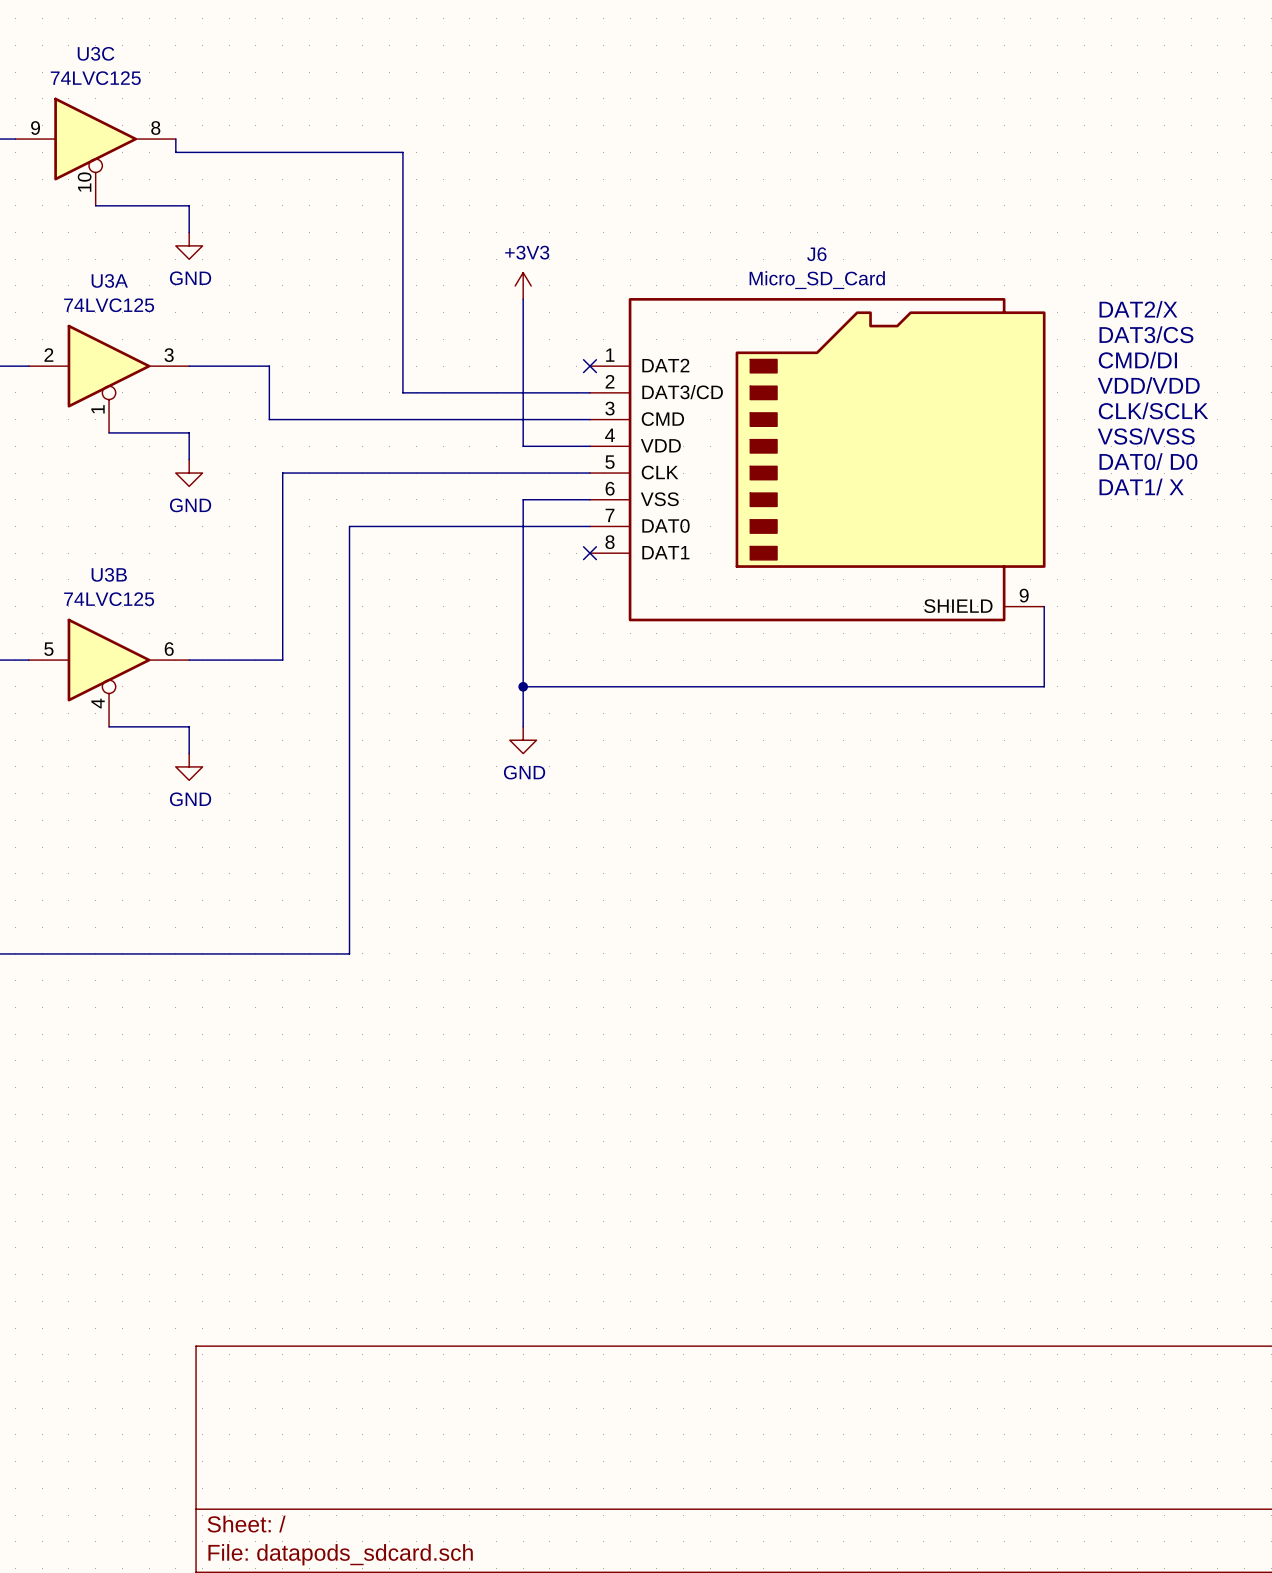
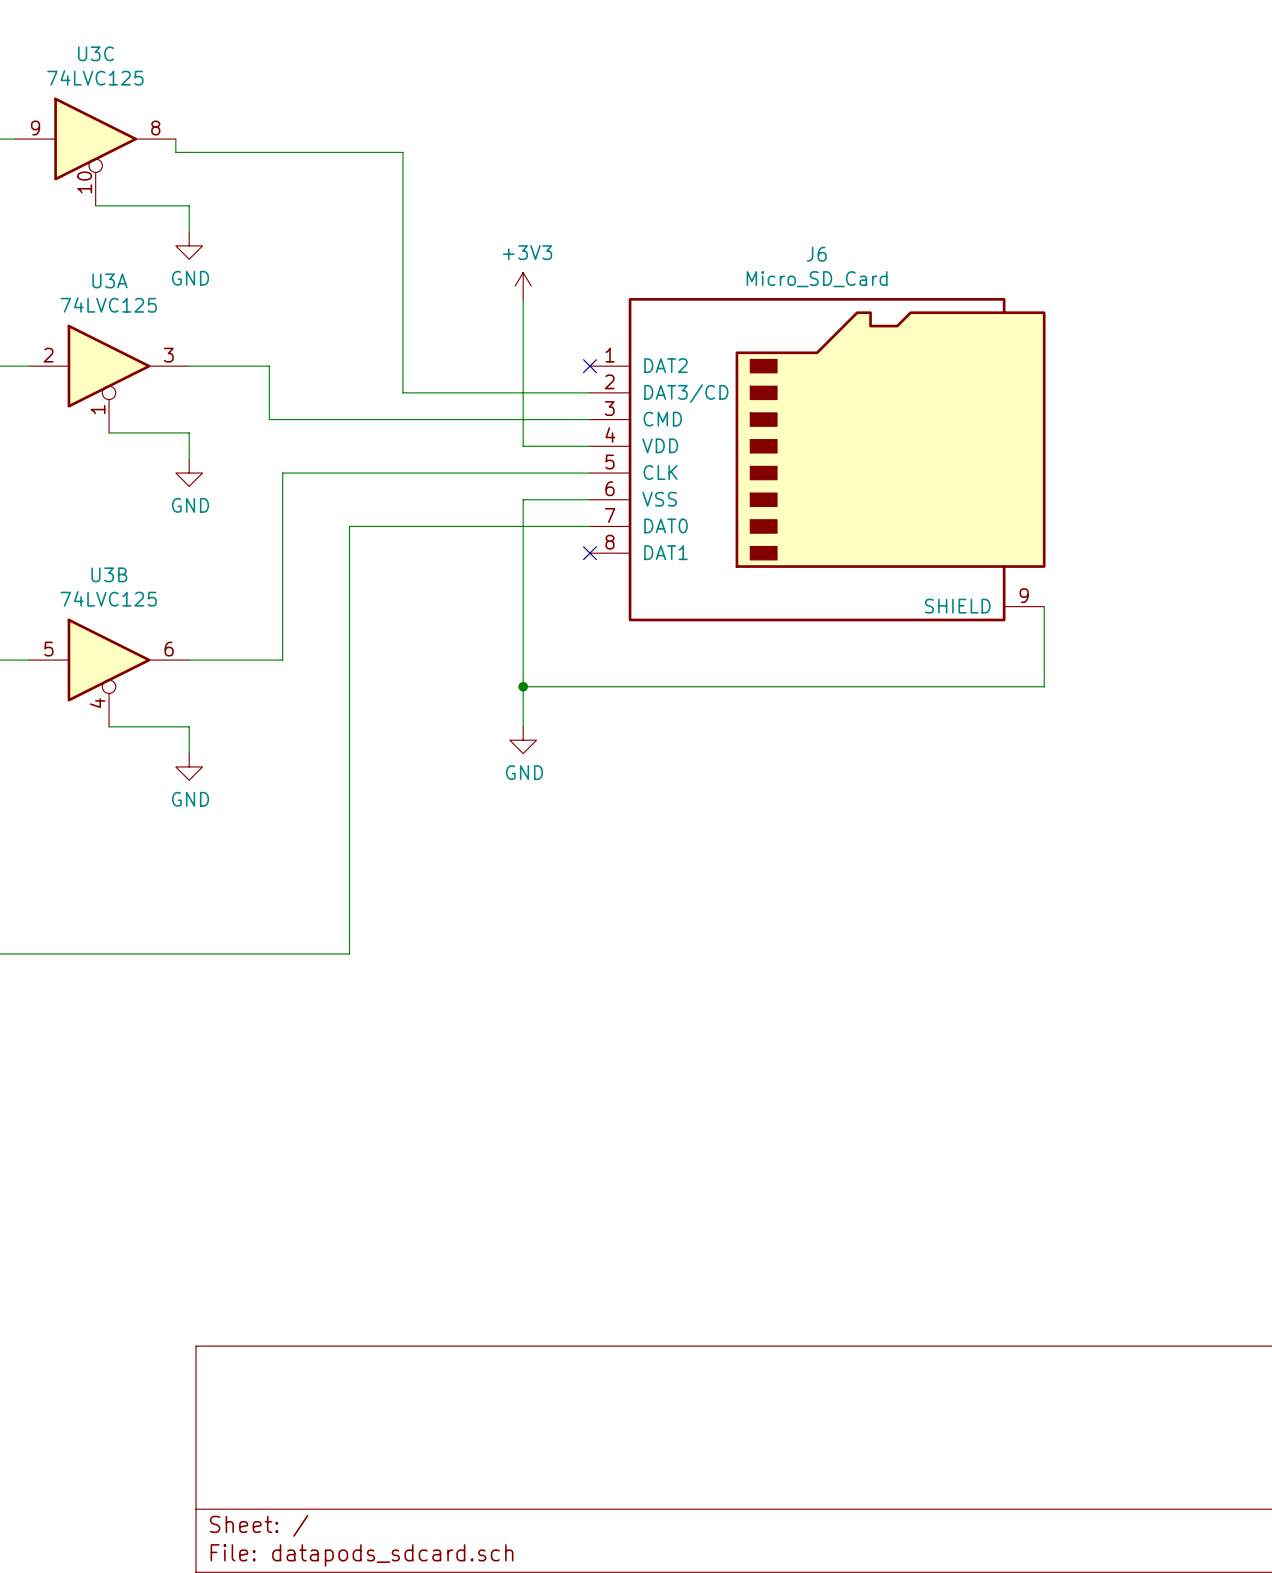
text: DAT2/X (1138, 309) -> none
text: DAT3/CS (1146, 334) -> none
text: CMD/DI (1137, 360) -> none
text: VDD/VDD (1148, 385) -> none
text: CLK/SCLK (1153, 410) -> none
text: VSS/VSS (1146, 436) -> none
text: DAT0/ D0 (1148, 461) -> none
text: DAT1/ X (1141, 486) -> none

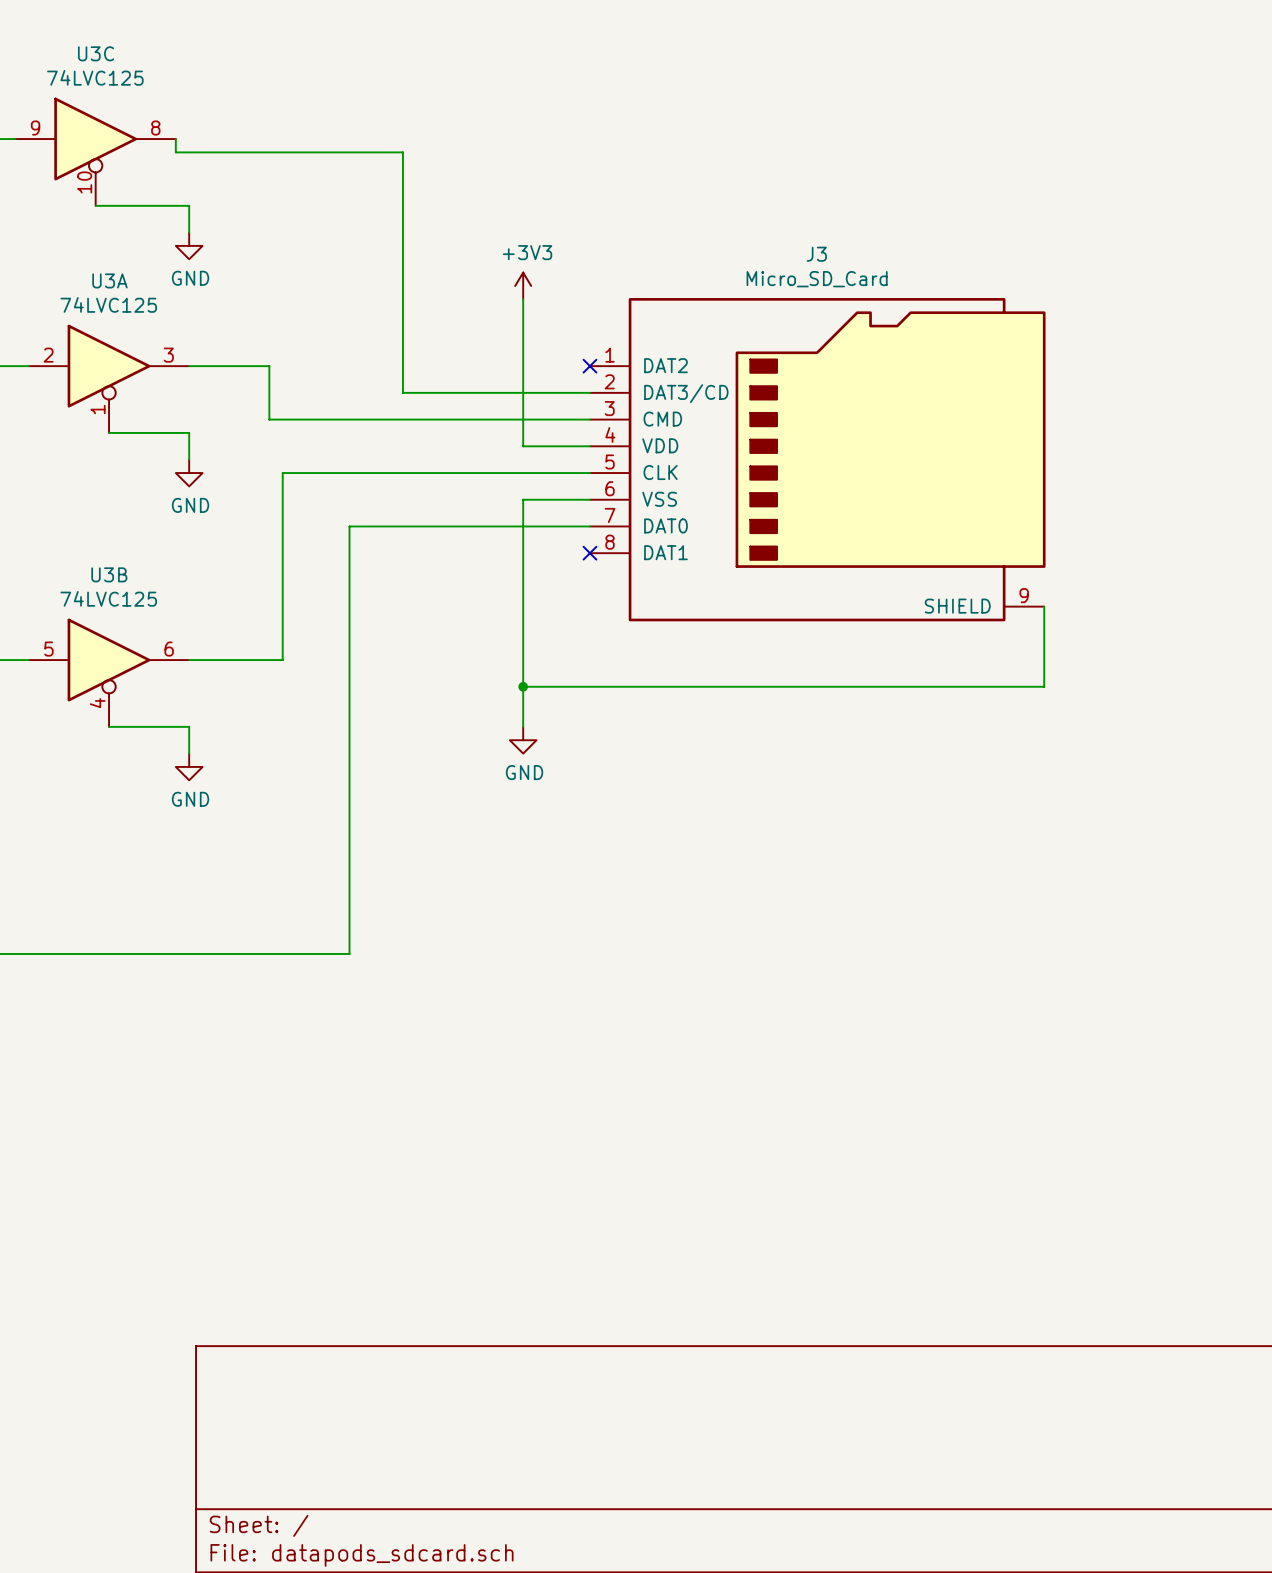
J6 name: J6 (816, 254) -> J3 (816, 254)

